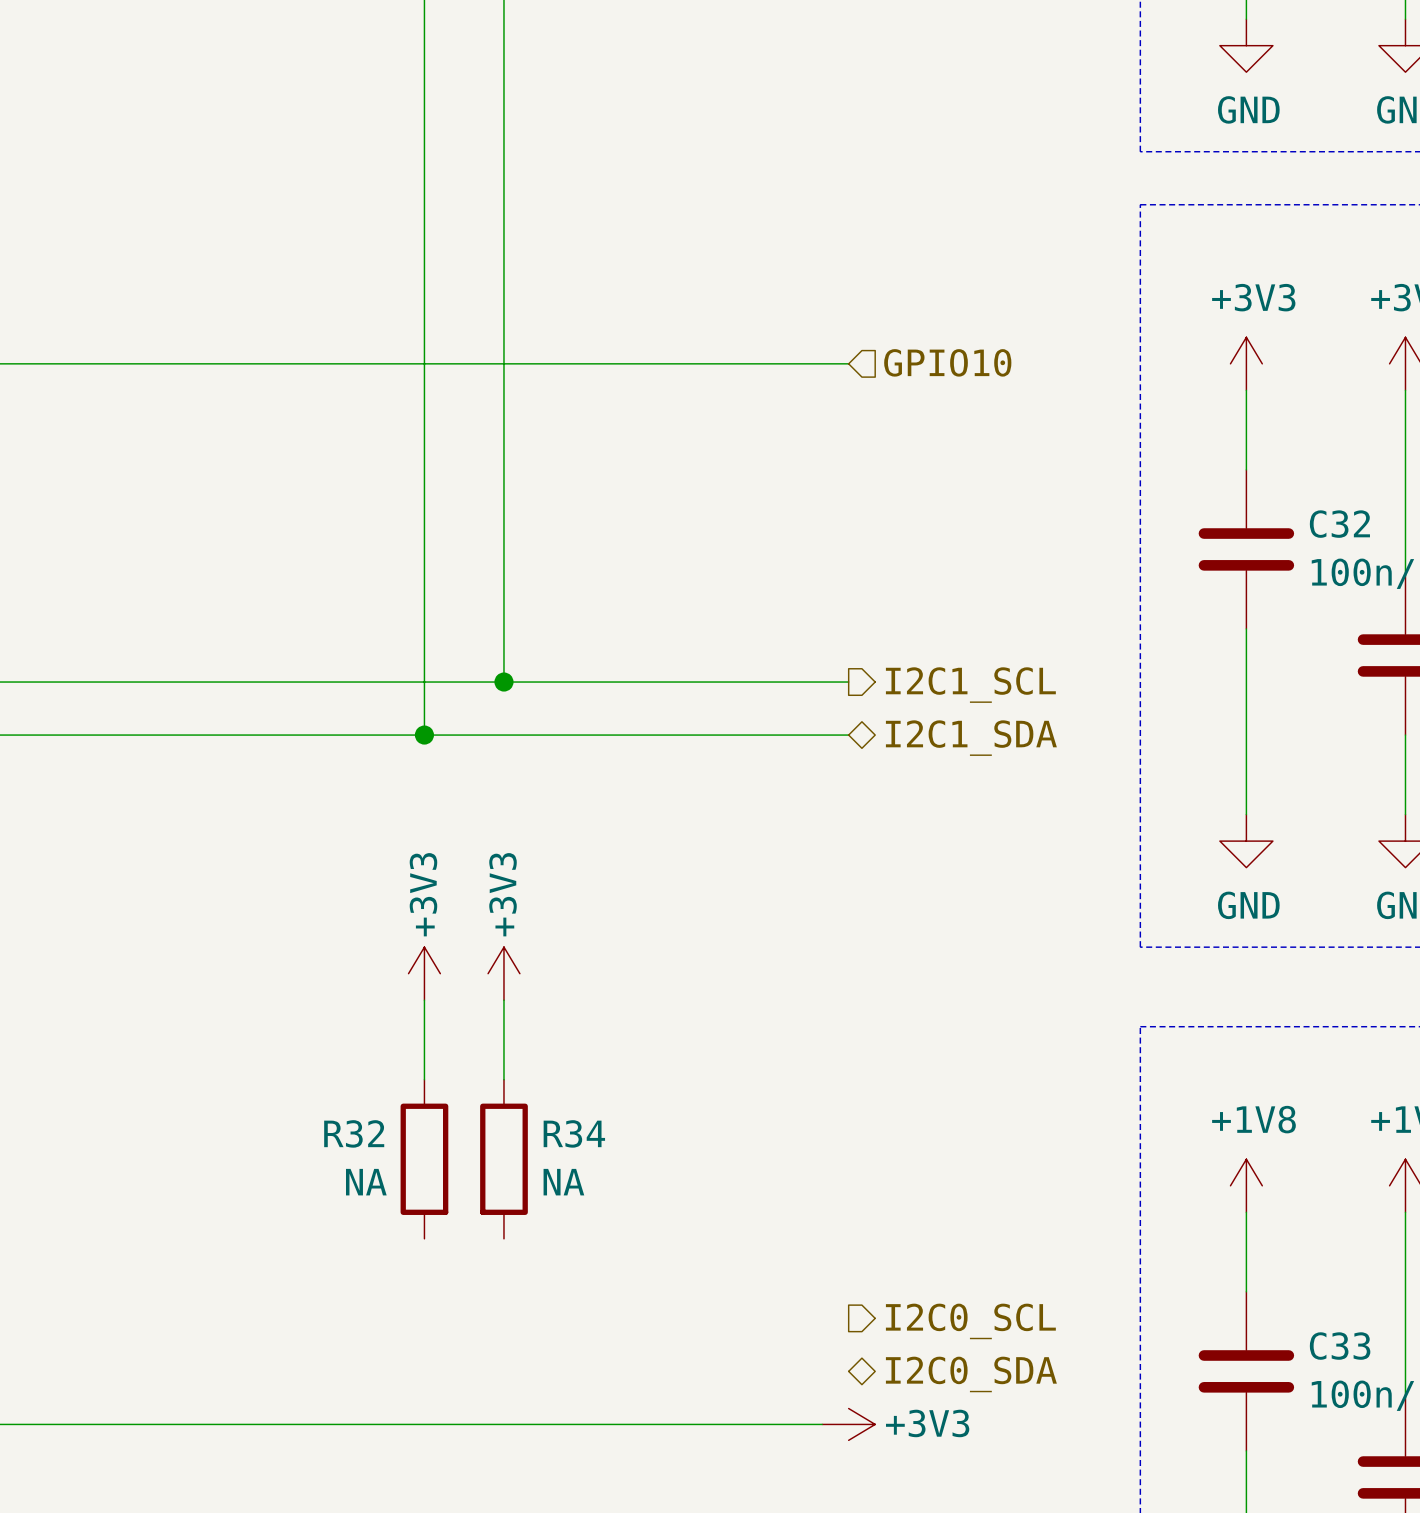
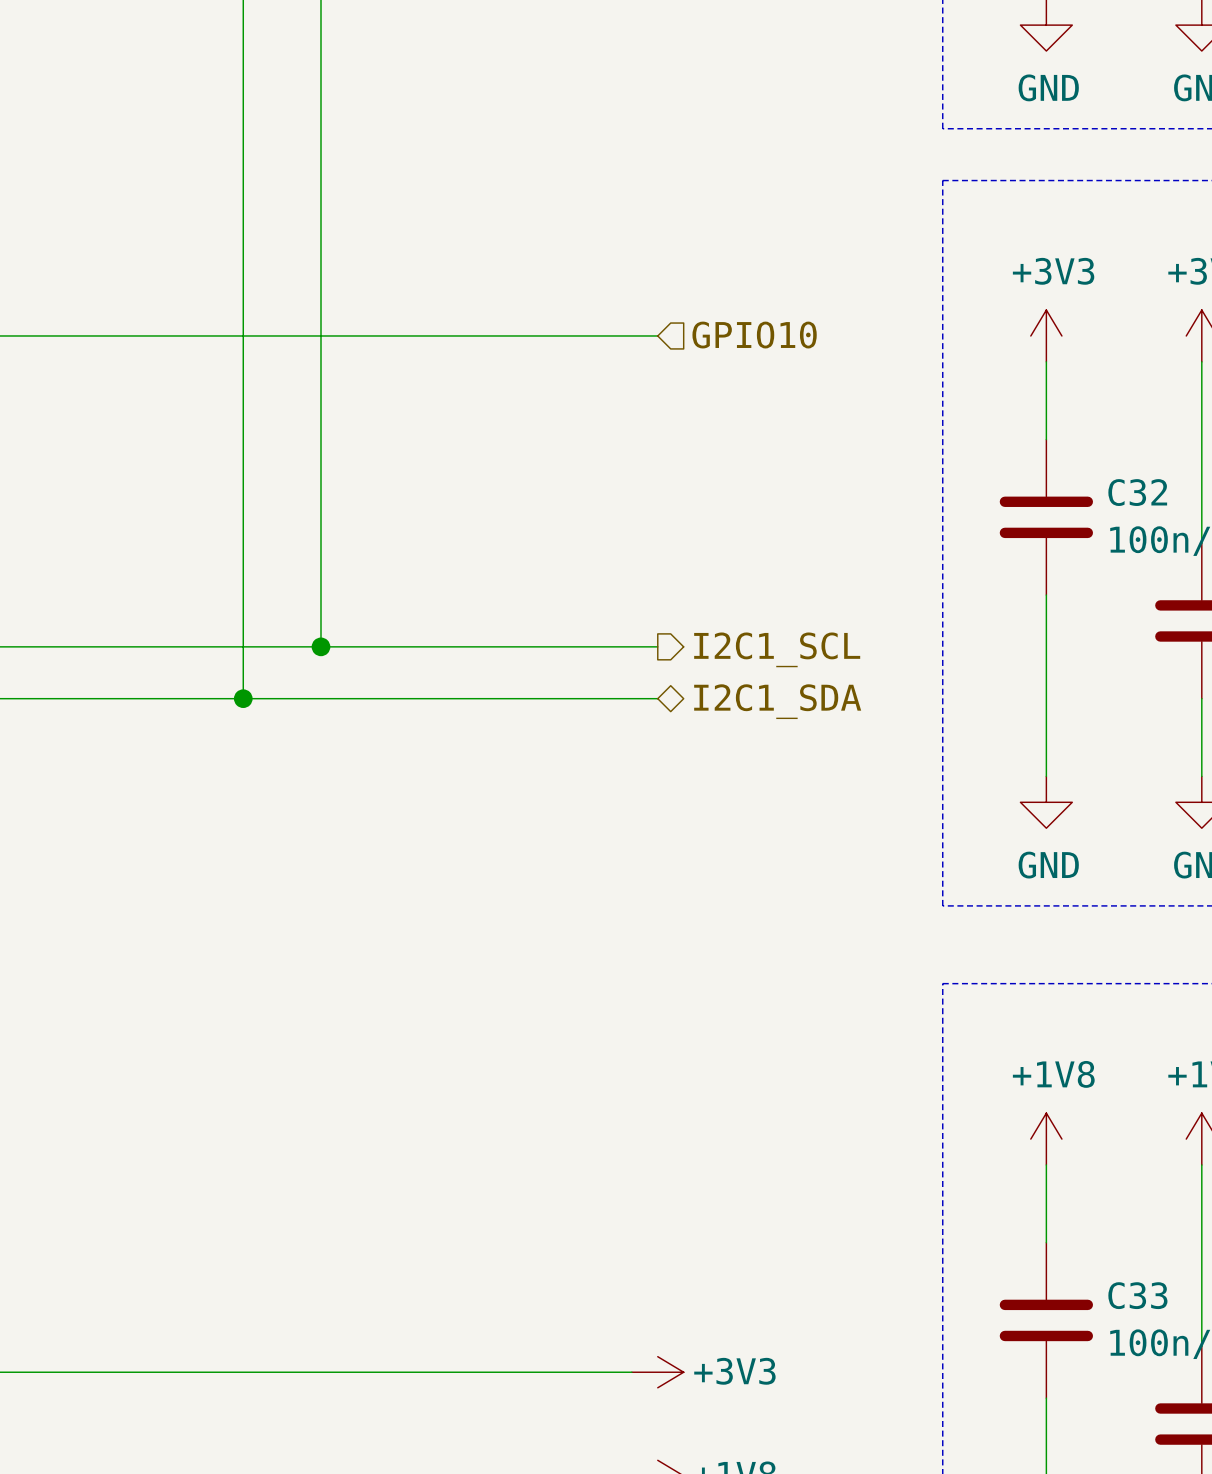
power symbol: +3V3 (424, 973) -> none
power symbol: +3V3 (503, 973) -> none
wire: (424, 1000) (424, 1079) -> none
wire: (503, 1000) (503, 1079) -> none
R32: NA (424, 1159) -> none
R34: NA (503, 1159) -> none
hierarchical label: I2C0_SCL (970, 1321) -> none
hierarchical label: I2C0_SDA (971, 1374) -> none

